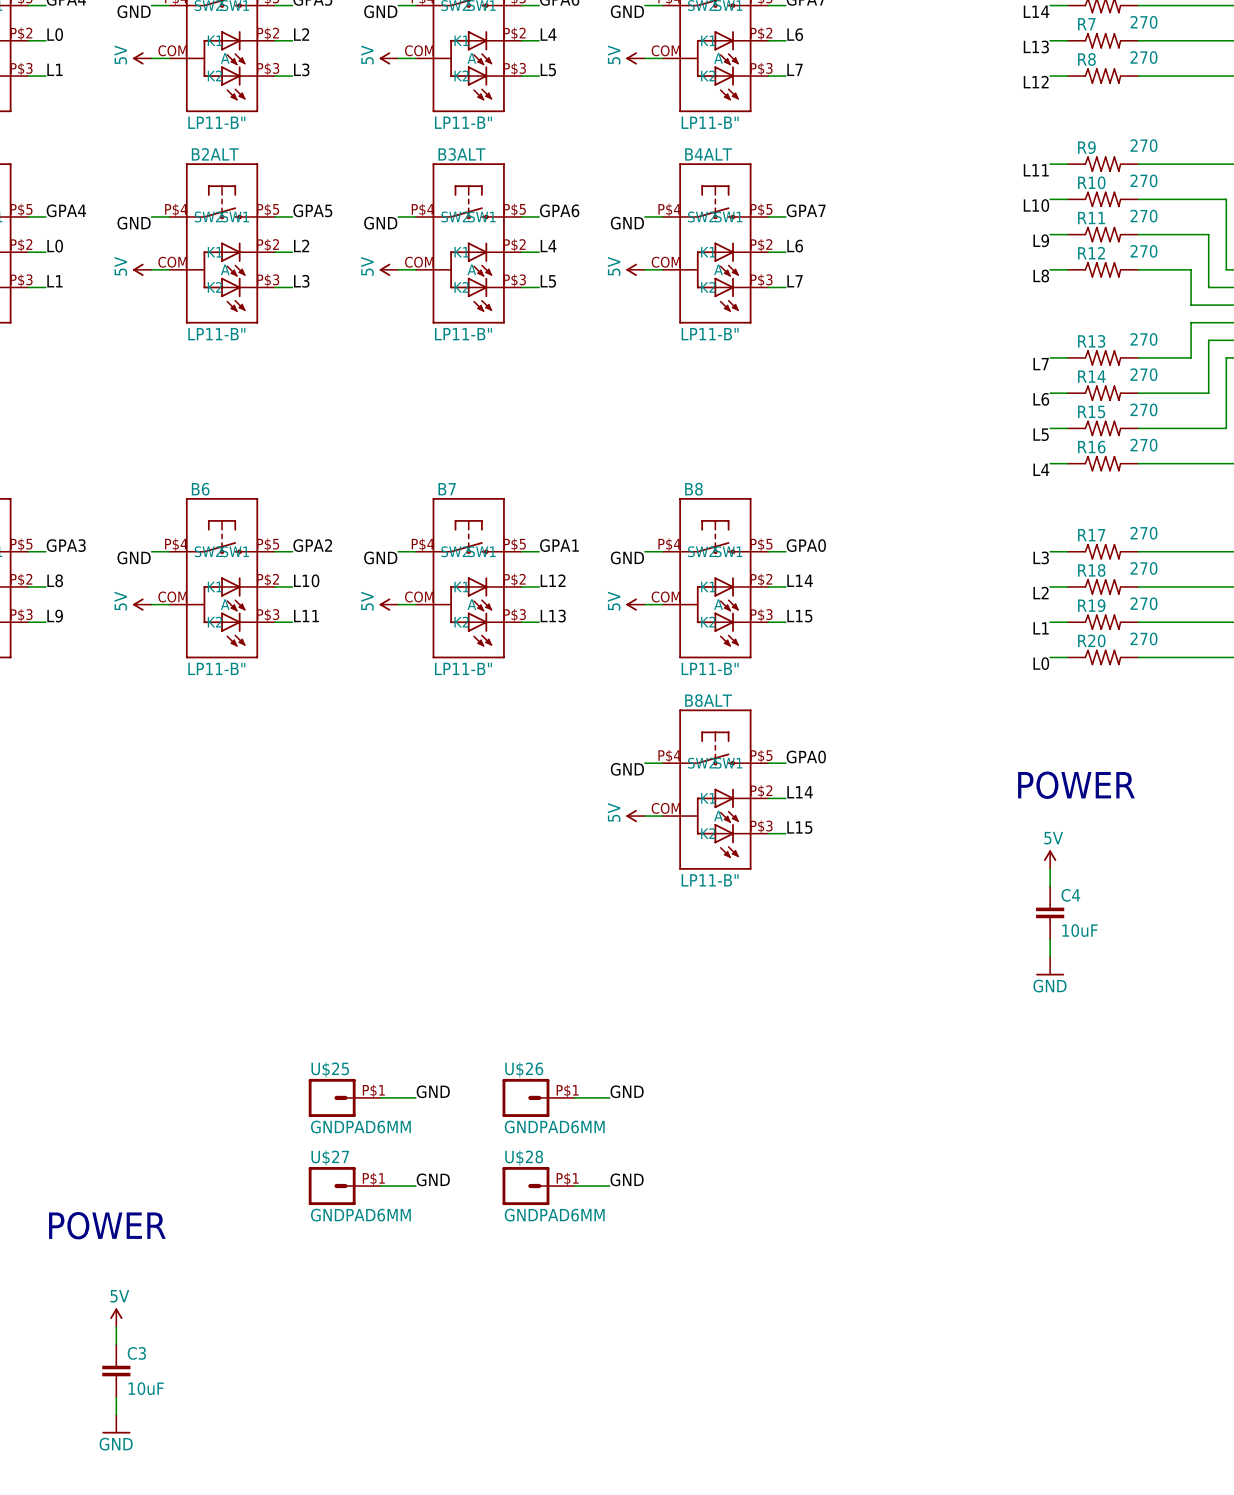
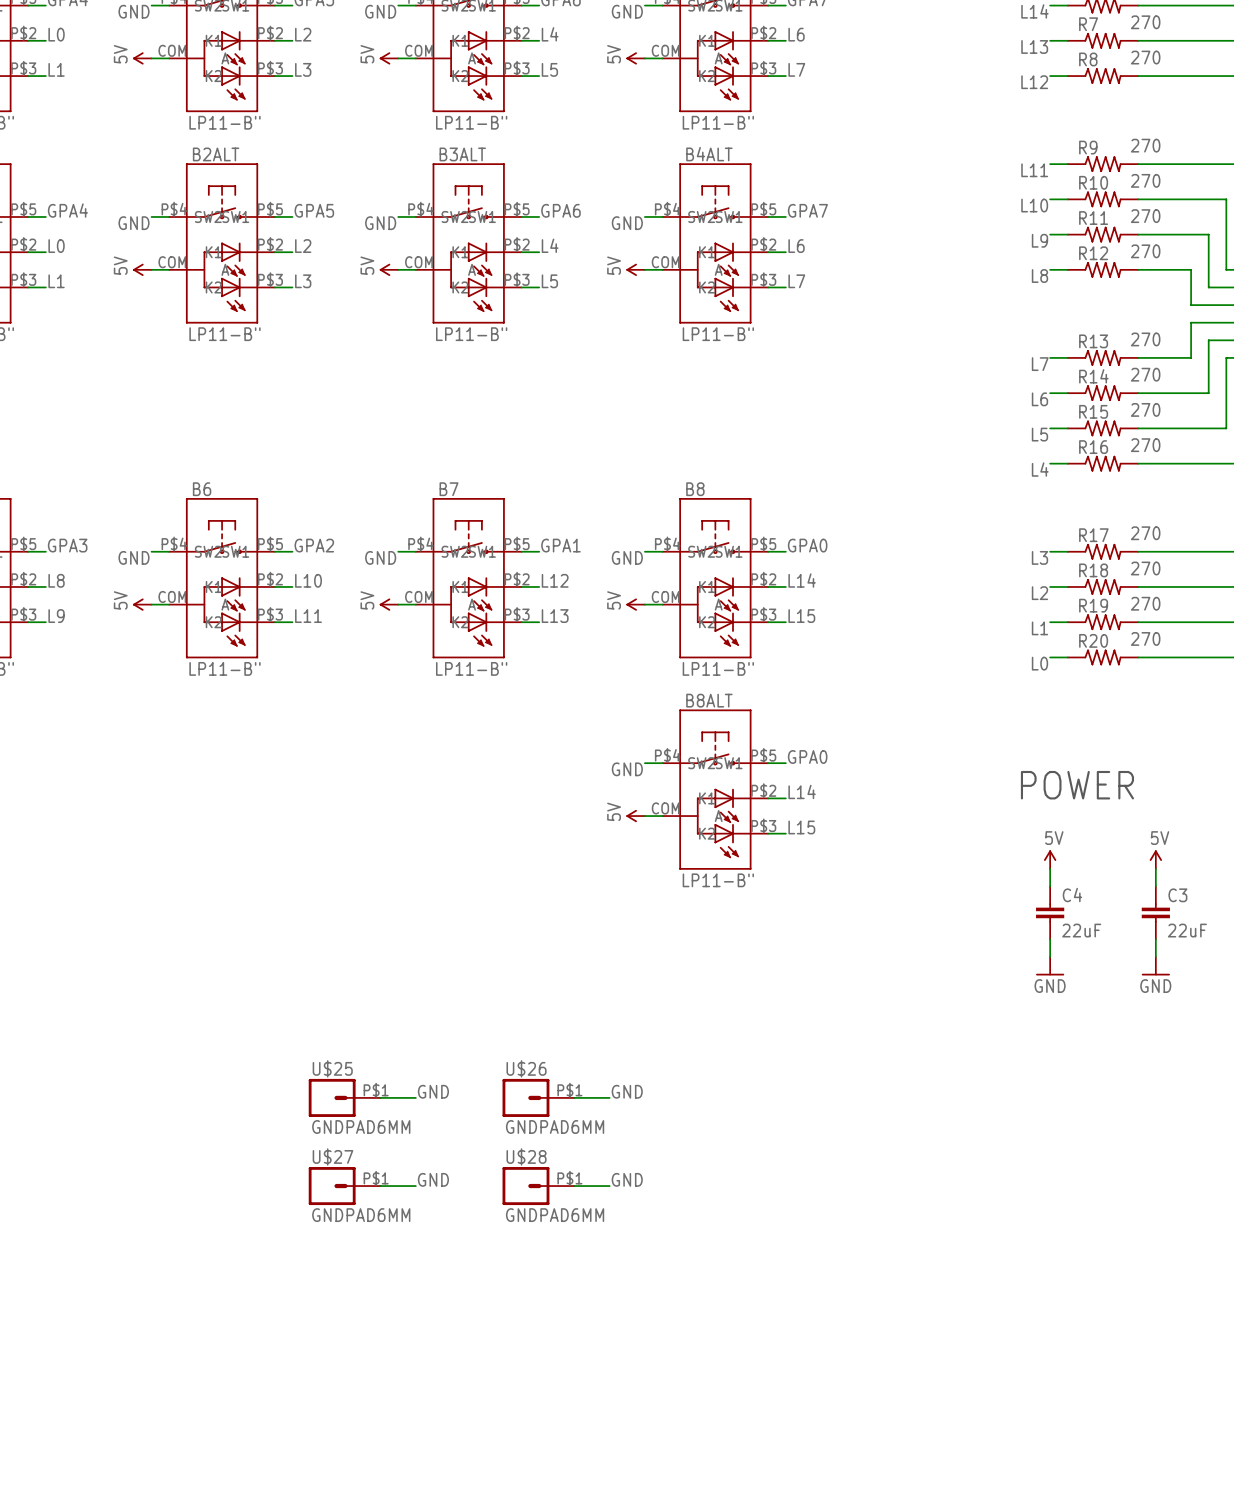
power symbol: none -> 5V (1155, 859)
wire: none -> (1155, 868) (1155, 886)
C4 value: 10uF (1079, 930) -> 22uF (1081, 930)
wire: none -> (1155, 939) (1155, 956)
power symbol: none -> GND (1155, 966)
text: POWER (107, 1225) -> none
power symbol: 5V (116, 1317) -> none
wire: (116, 1326) (116, 1344) -> none
C3 position: (116, 1371) -> (1155, 912)
C3 value: 10uF (146, 1388) -> 22uF (1187, 930)
wire: (116, 1397) (116, 1415) -> none
power symbol: GND (116, 1424) -> none

